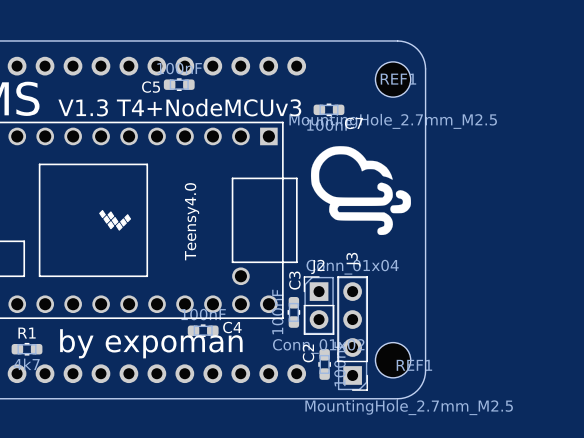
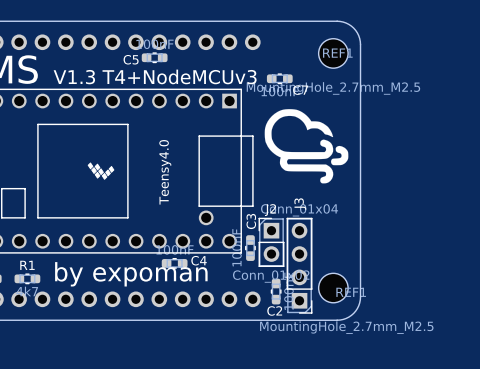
C2 name rotation: 0° (308, 353) -> 90° clockwise (274, 310)
C2 name position: C2 (308, 353) -> C2 (274, 310)

